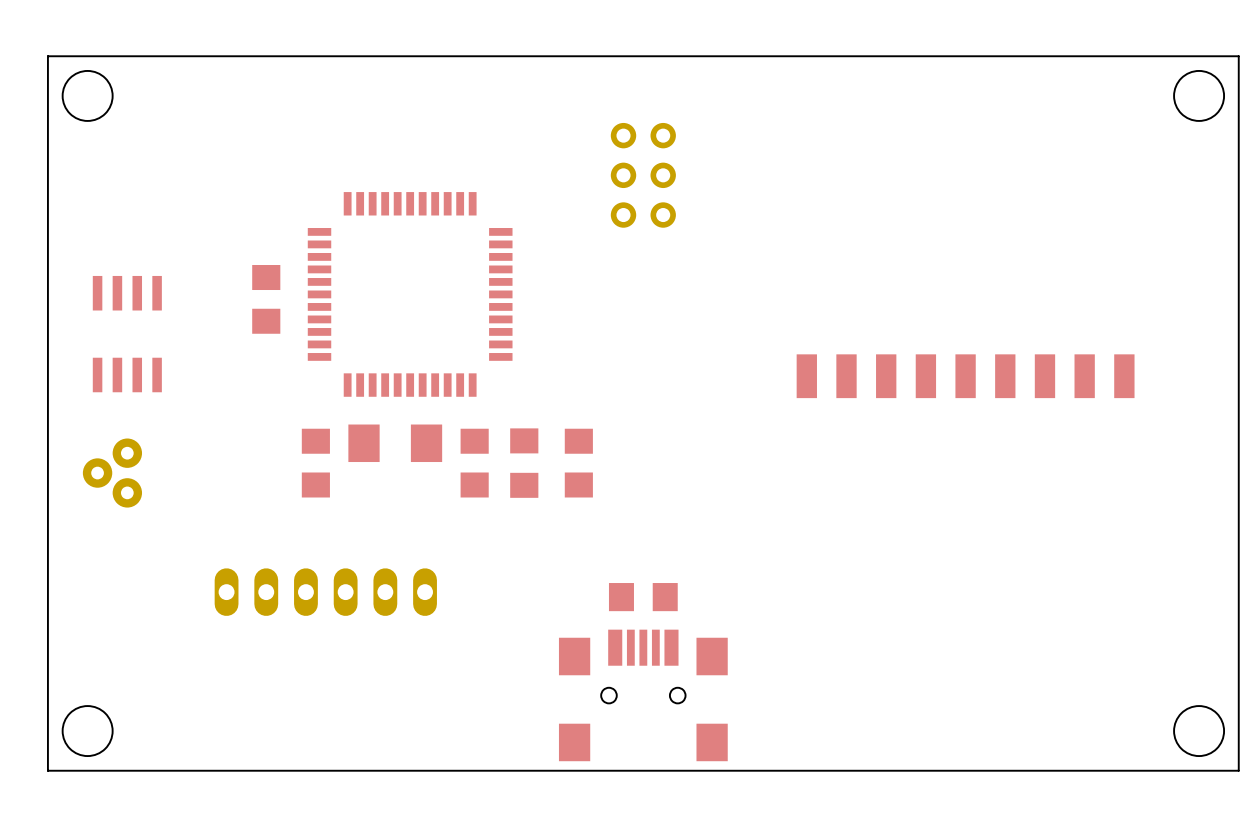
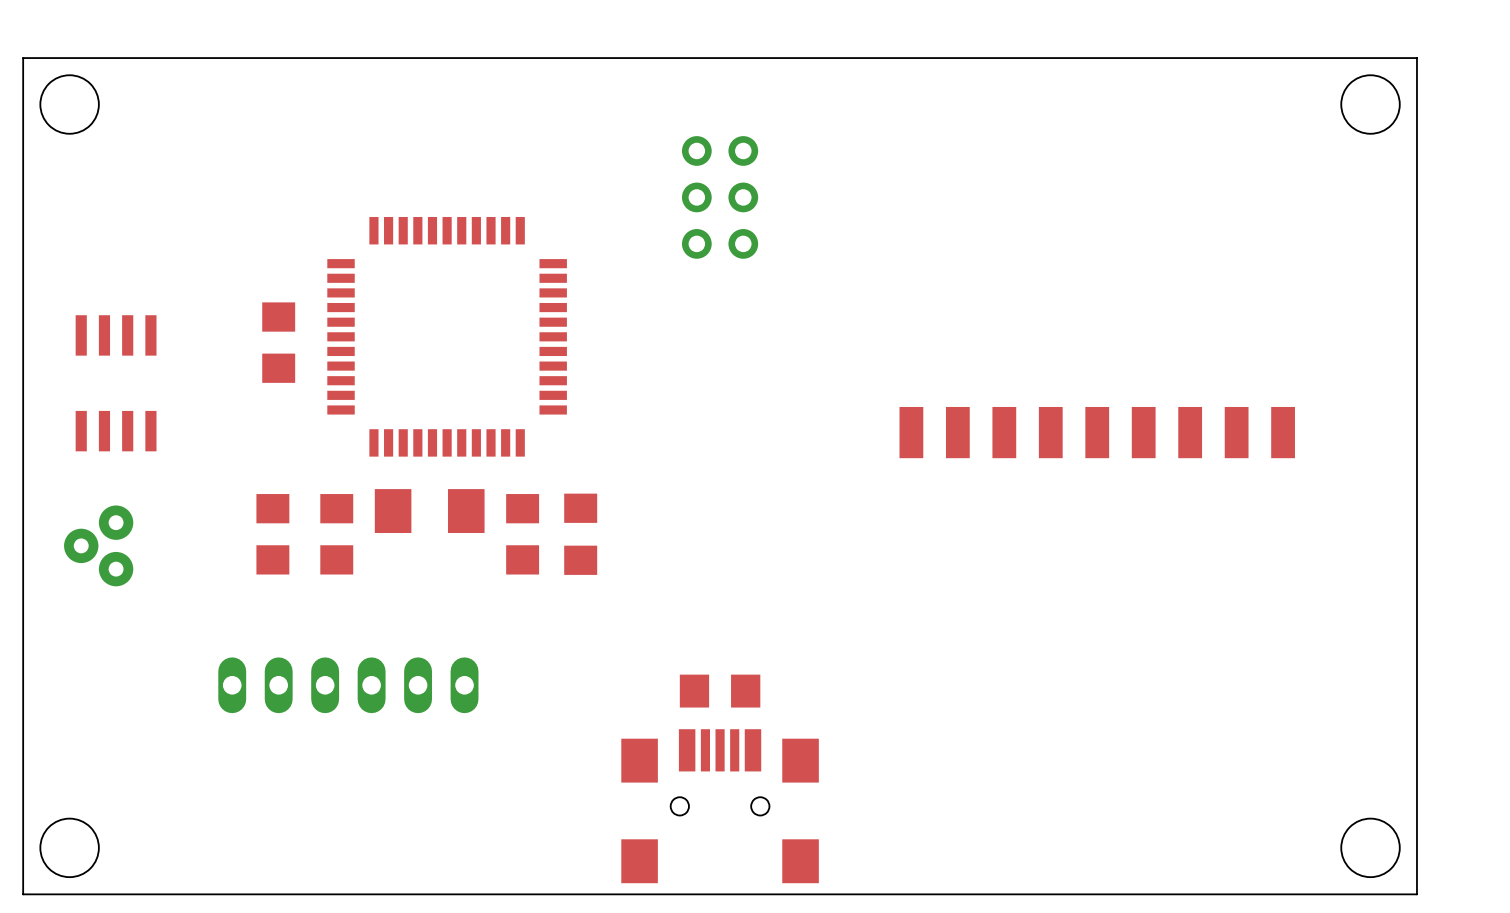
part position: (578, 463) -> (272, 534)

